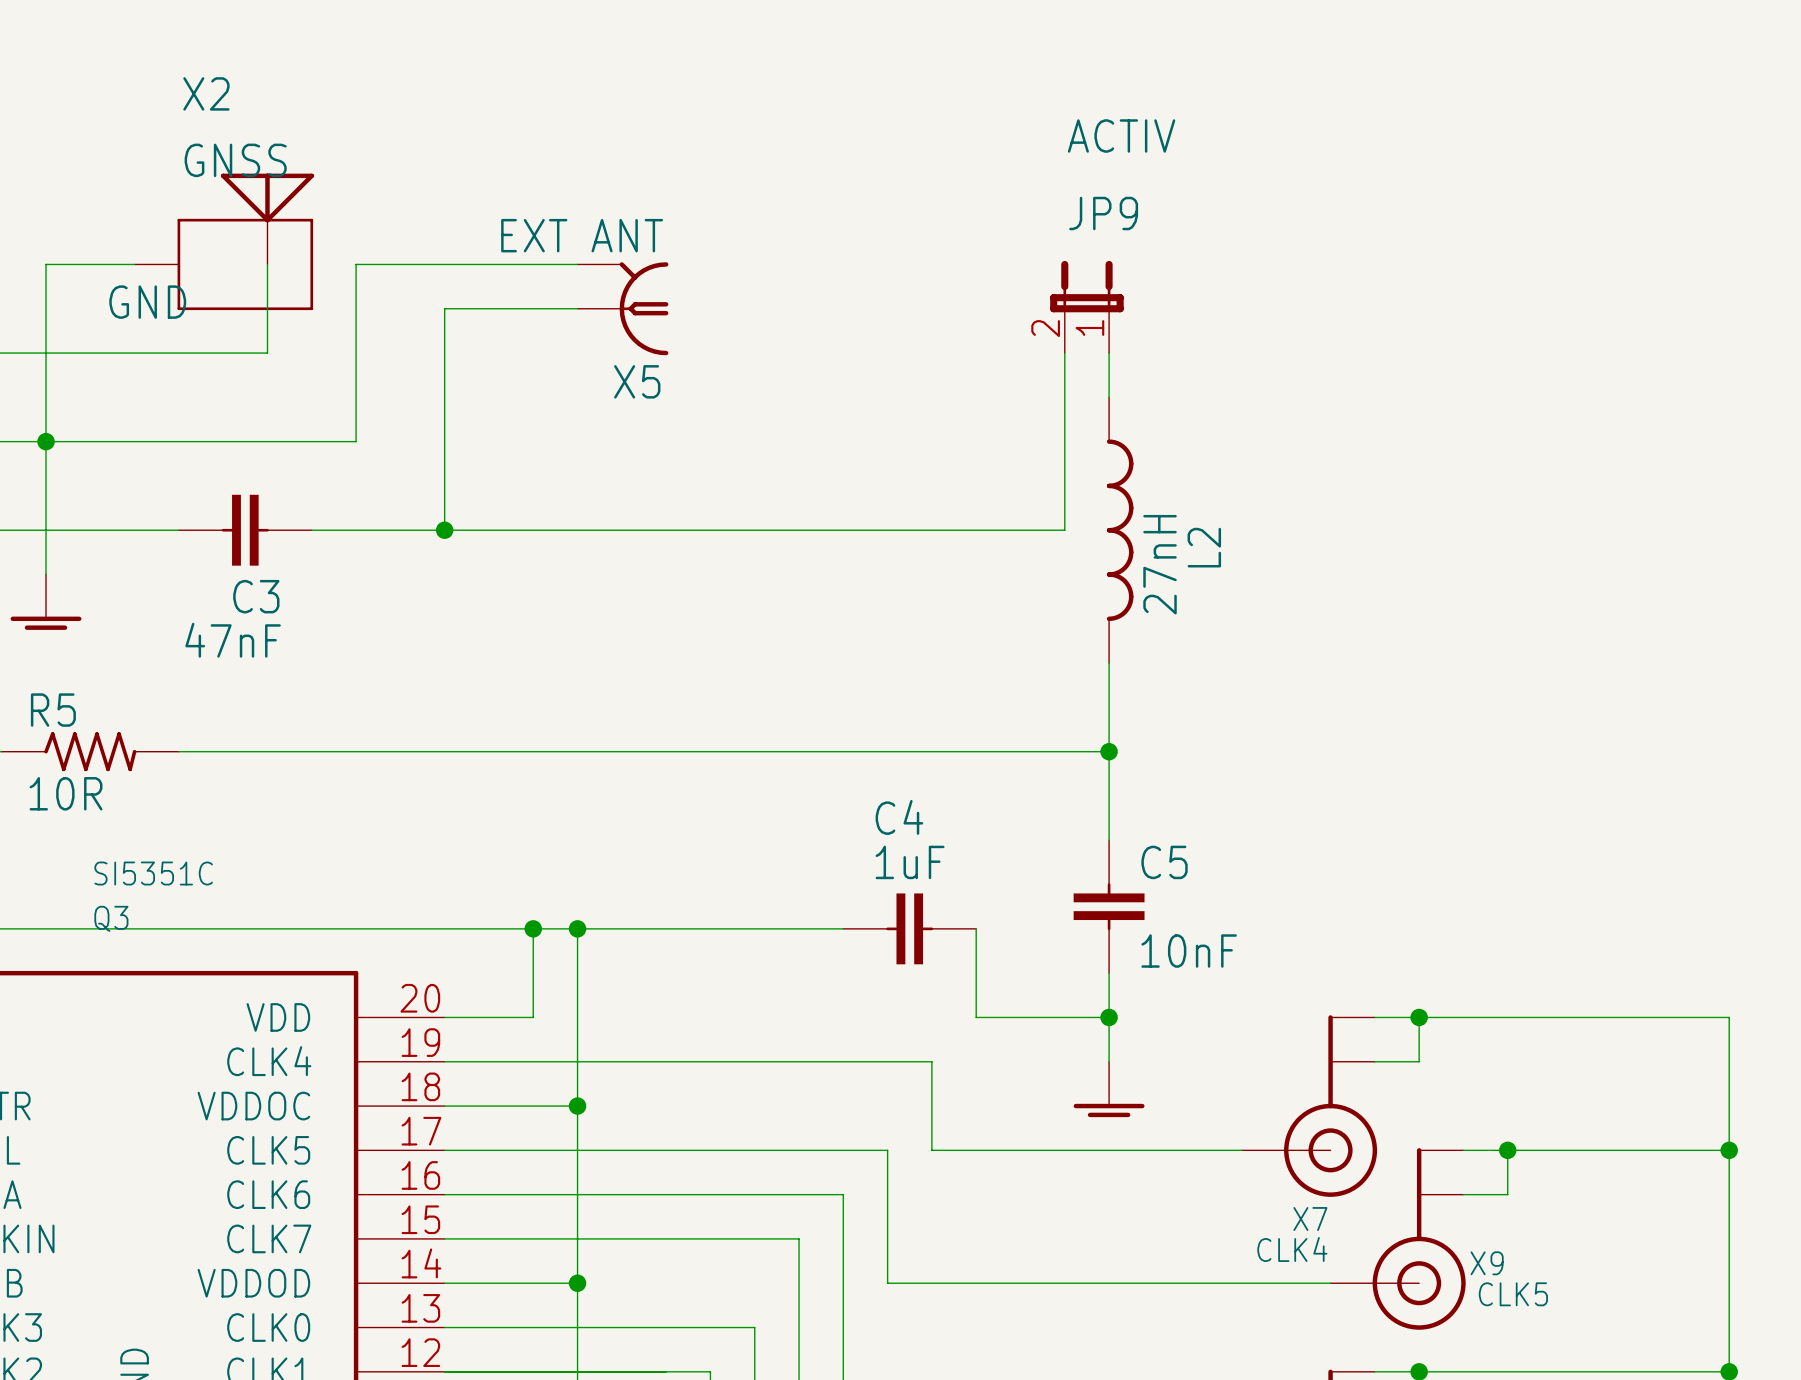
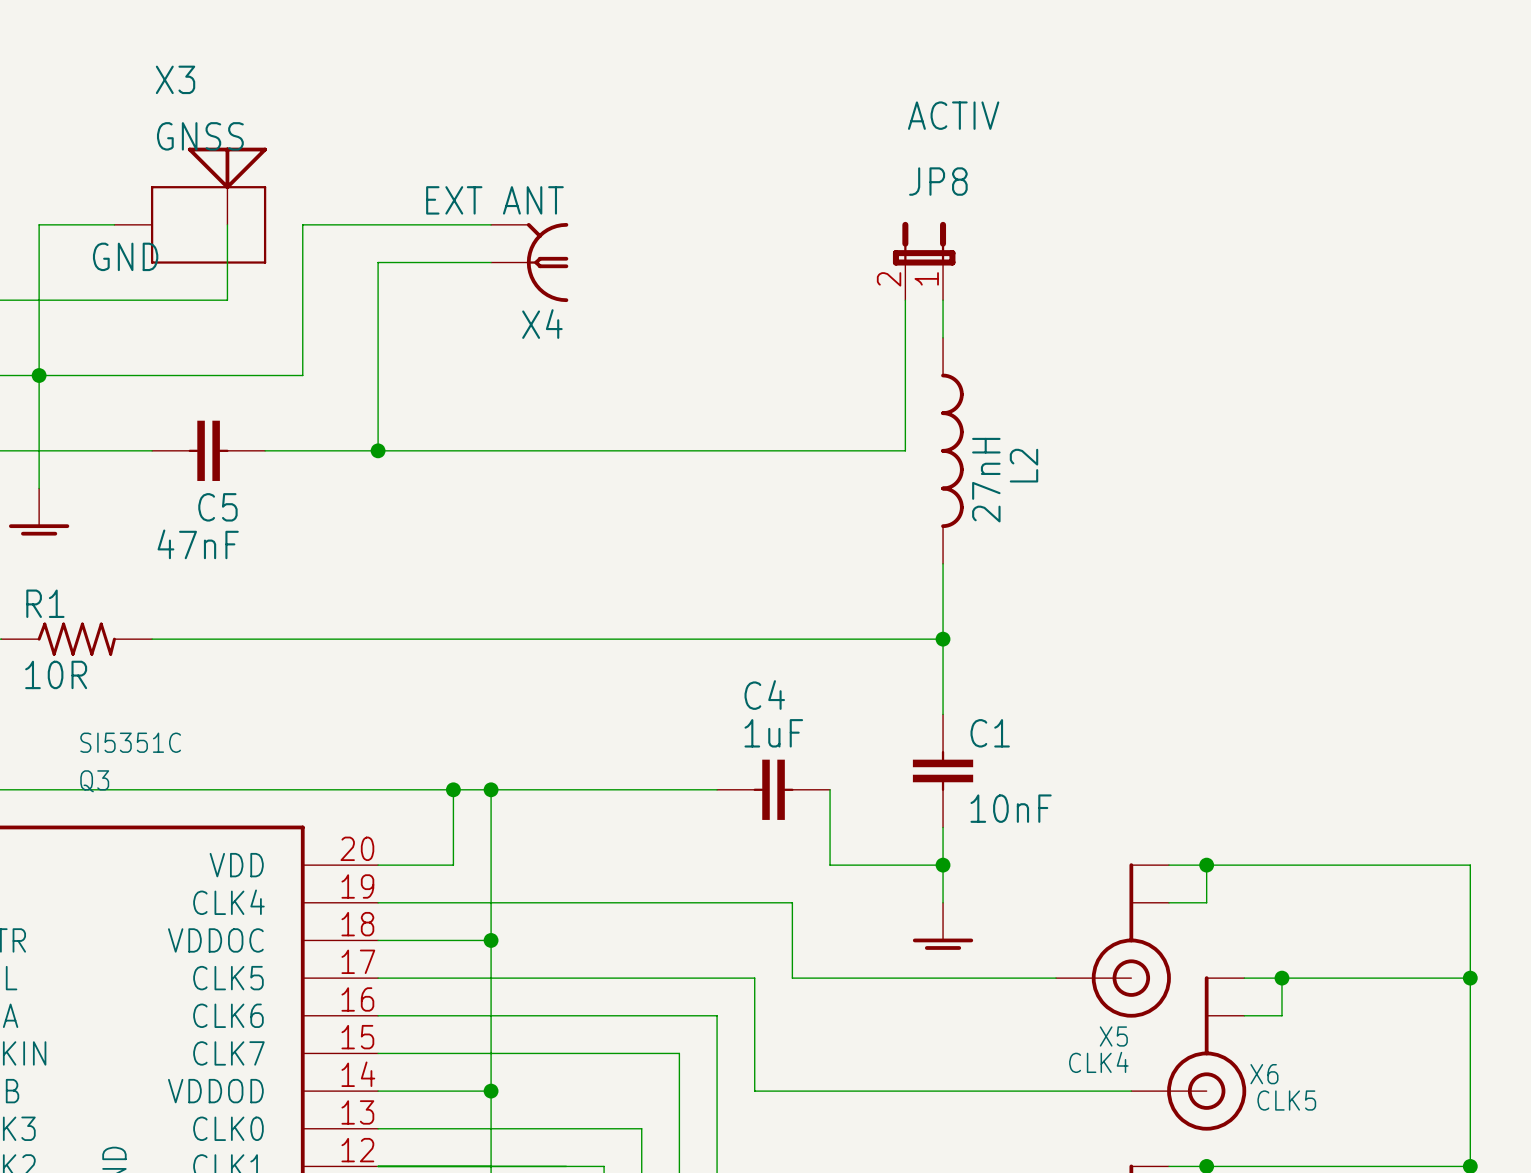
X2 name: X2 (206, 93) -> X3 (175, 79)
JP9 name: JP9 (1103, 213) -> JP8 (938, 181)
X5 name: X5 (637, 381) -> X4 (542, 324)
C3 name: C3 (256, 596) -> C5 (217, 507)
R5 name: R5 (53, 710) -> R1 (45, 603)
C5 name: C5 (1164, 862) -> C1 (990, 733)
X7 name: X7 (1310, 1219) -> X5 (1113, 1036)
X9 name: X9 (1487, 1263) -> X6 (1264, 1074)

